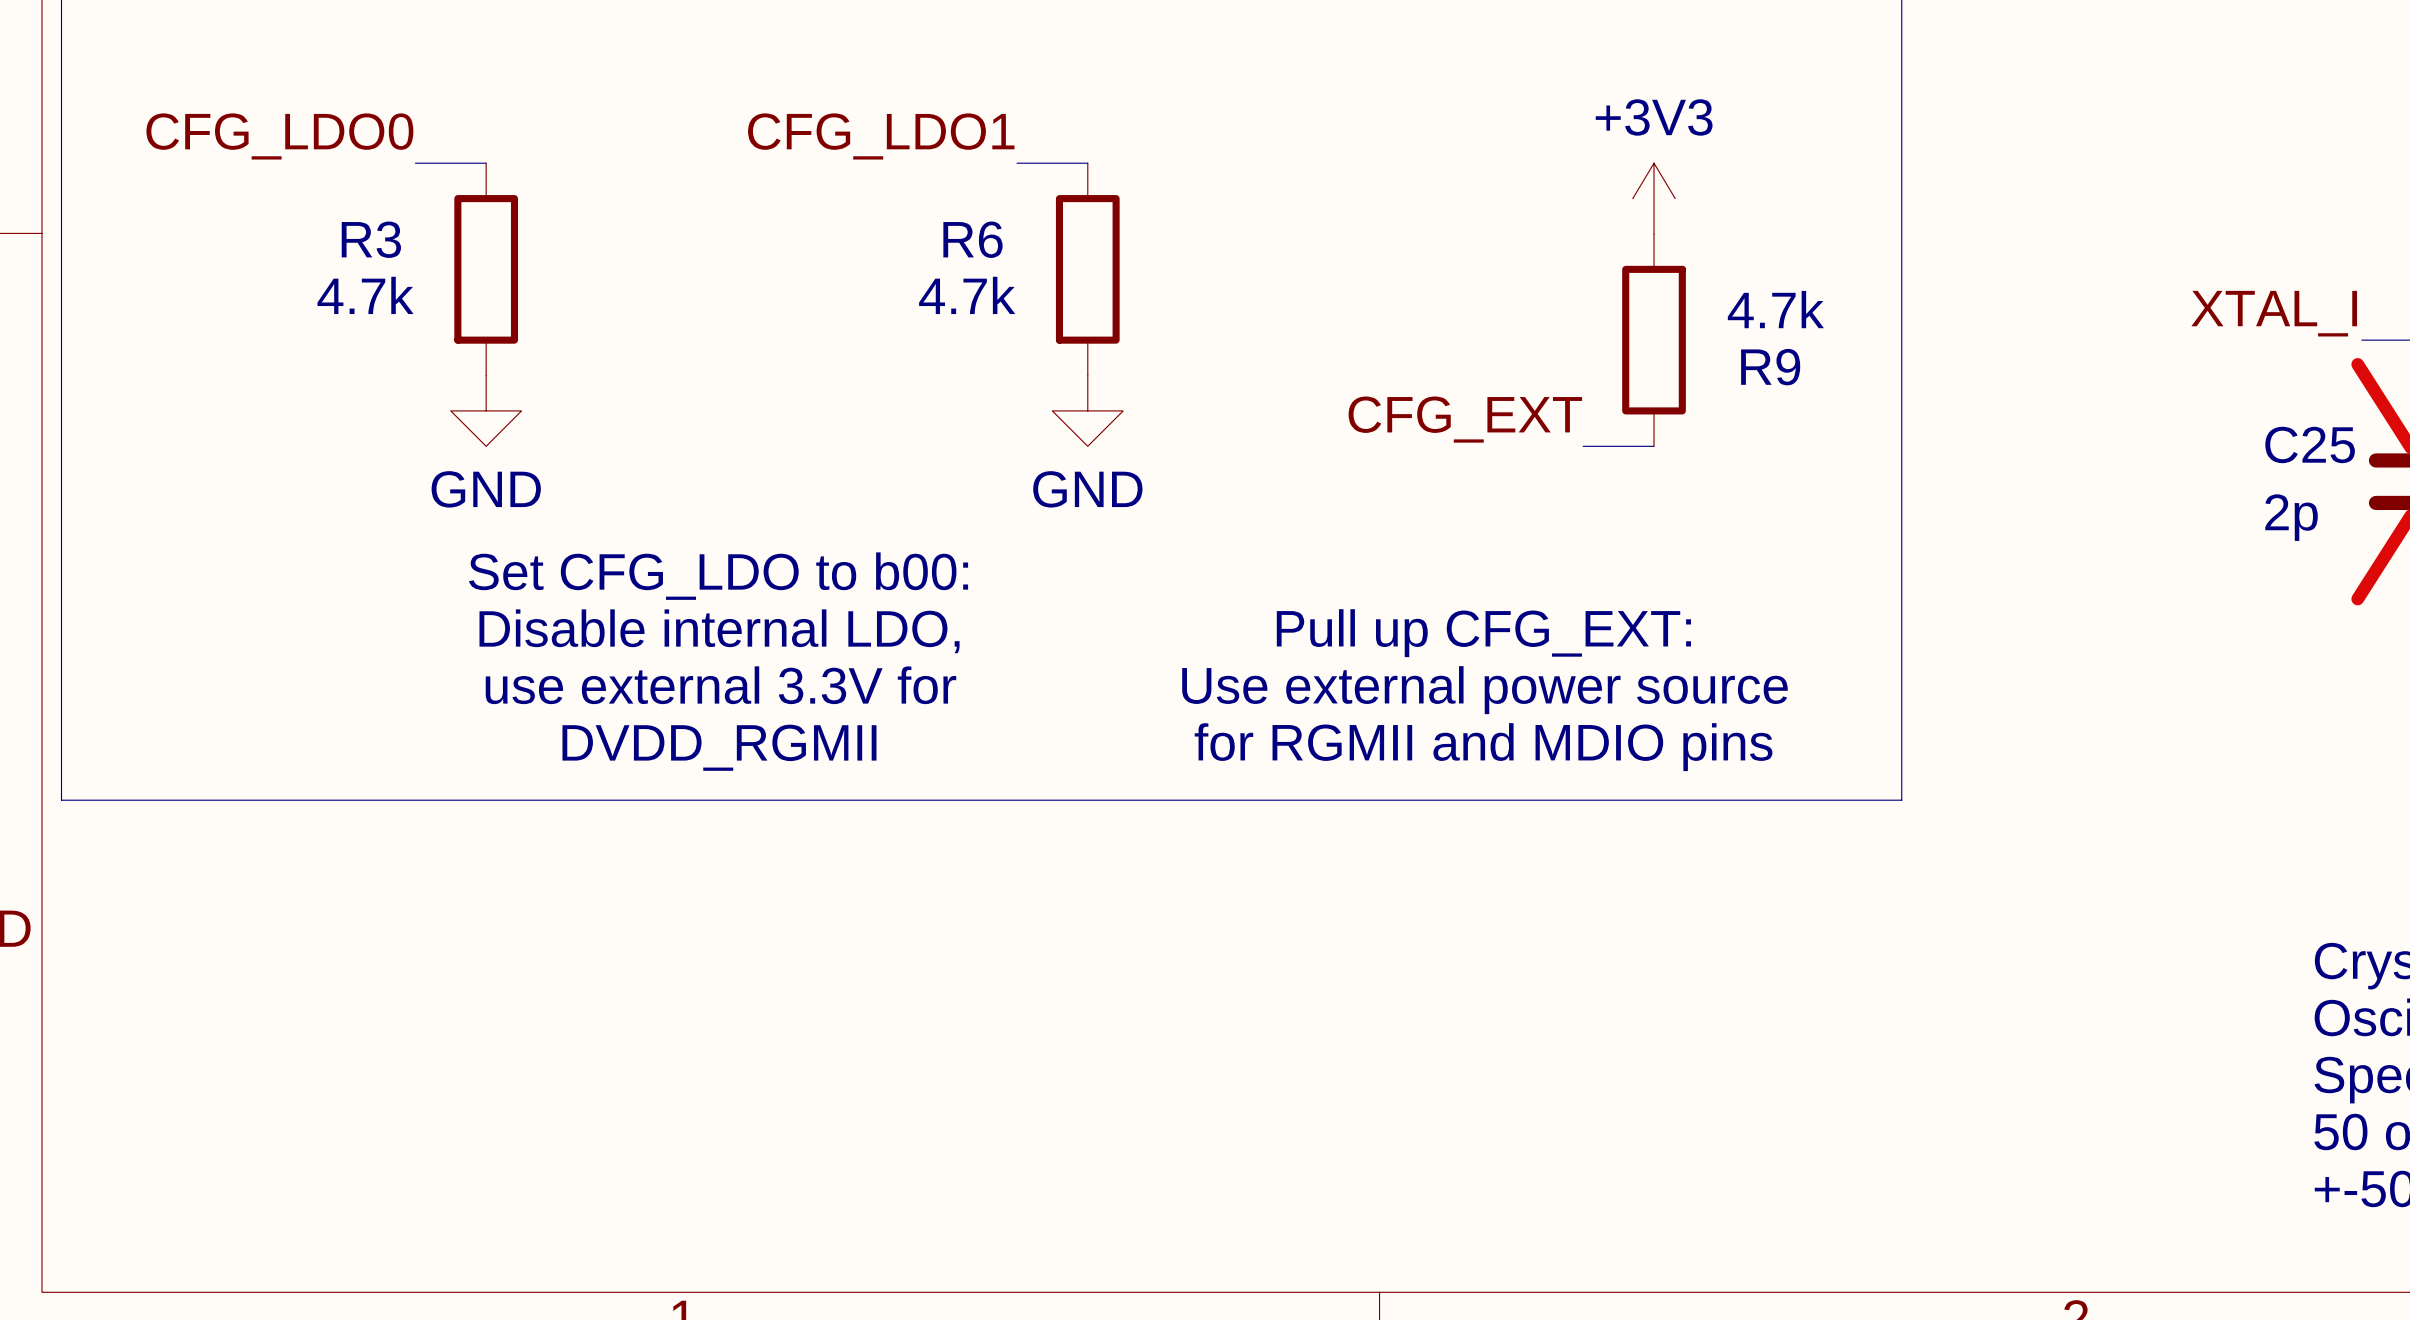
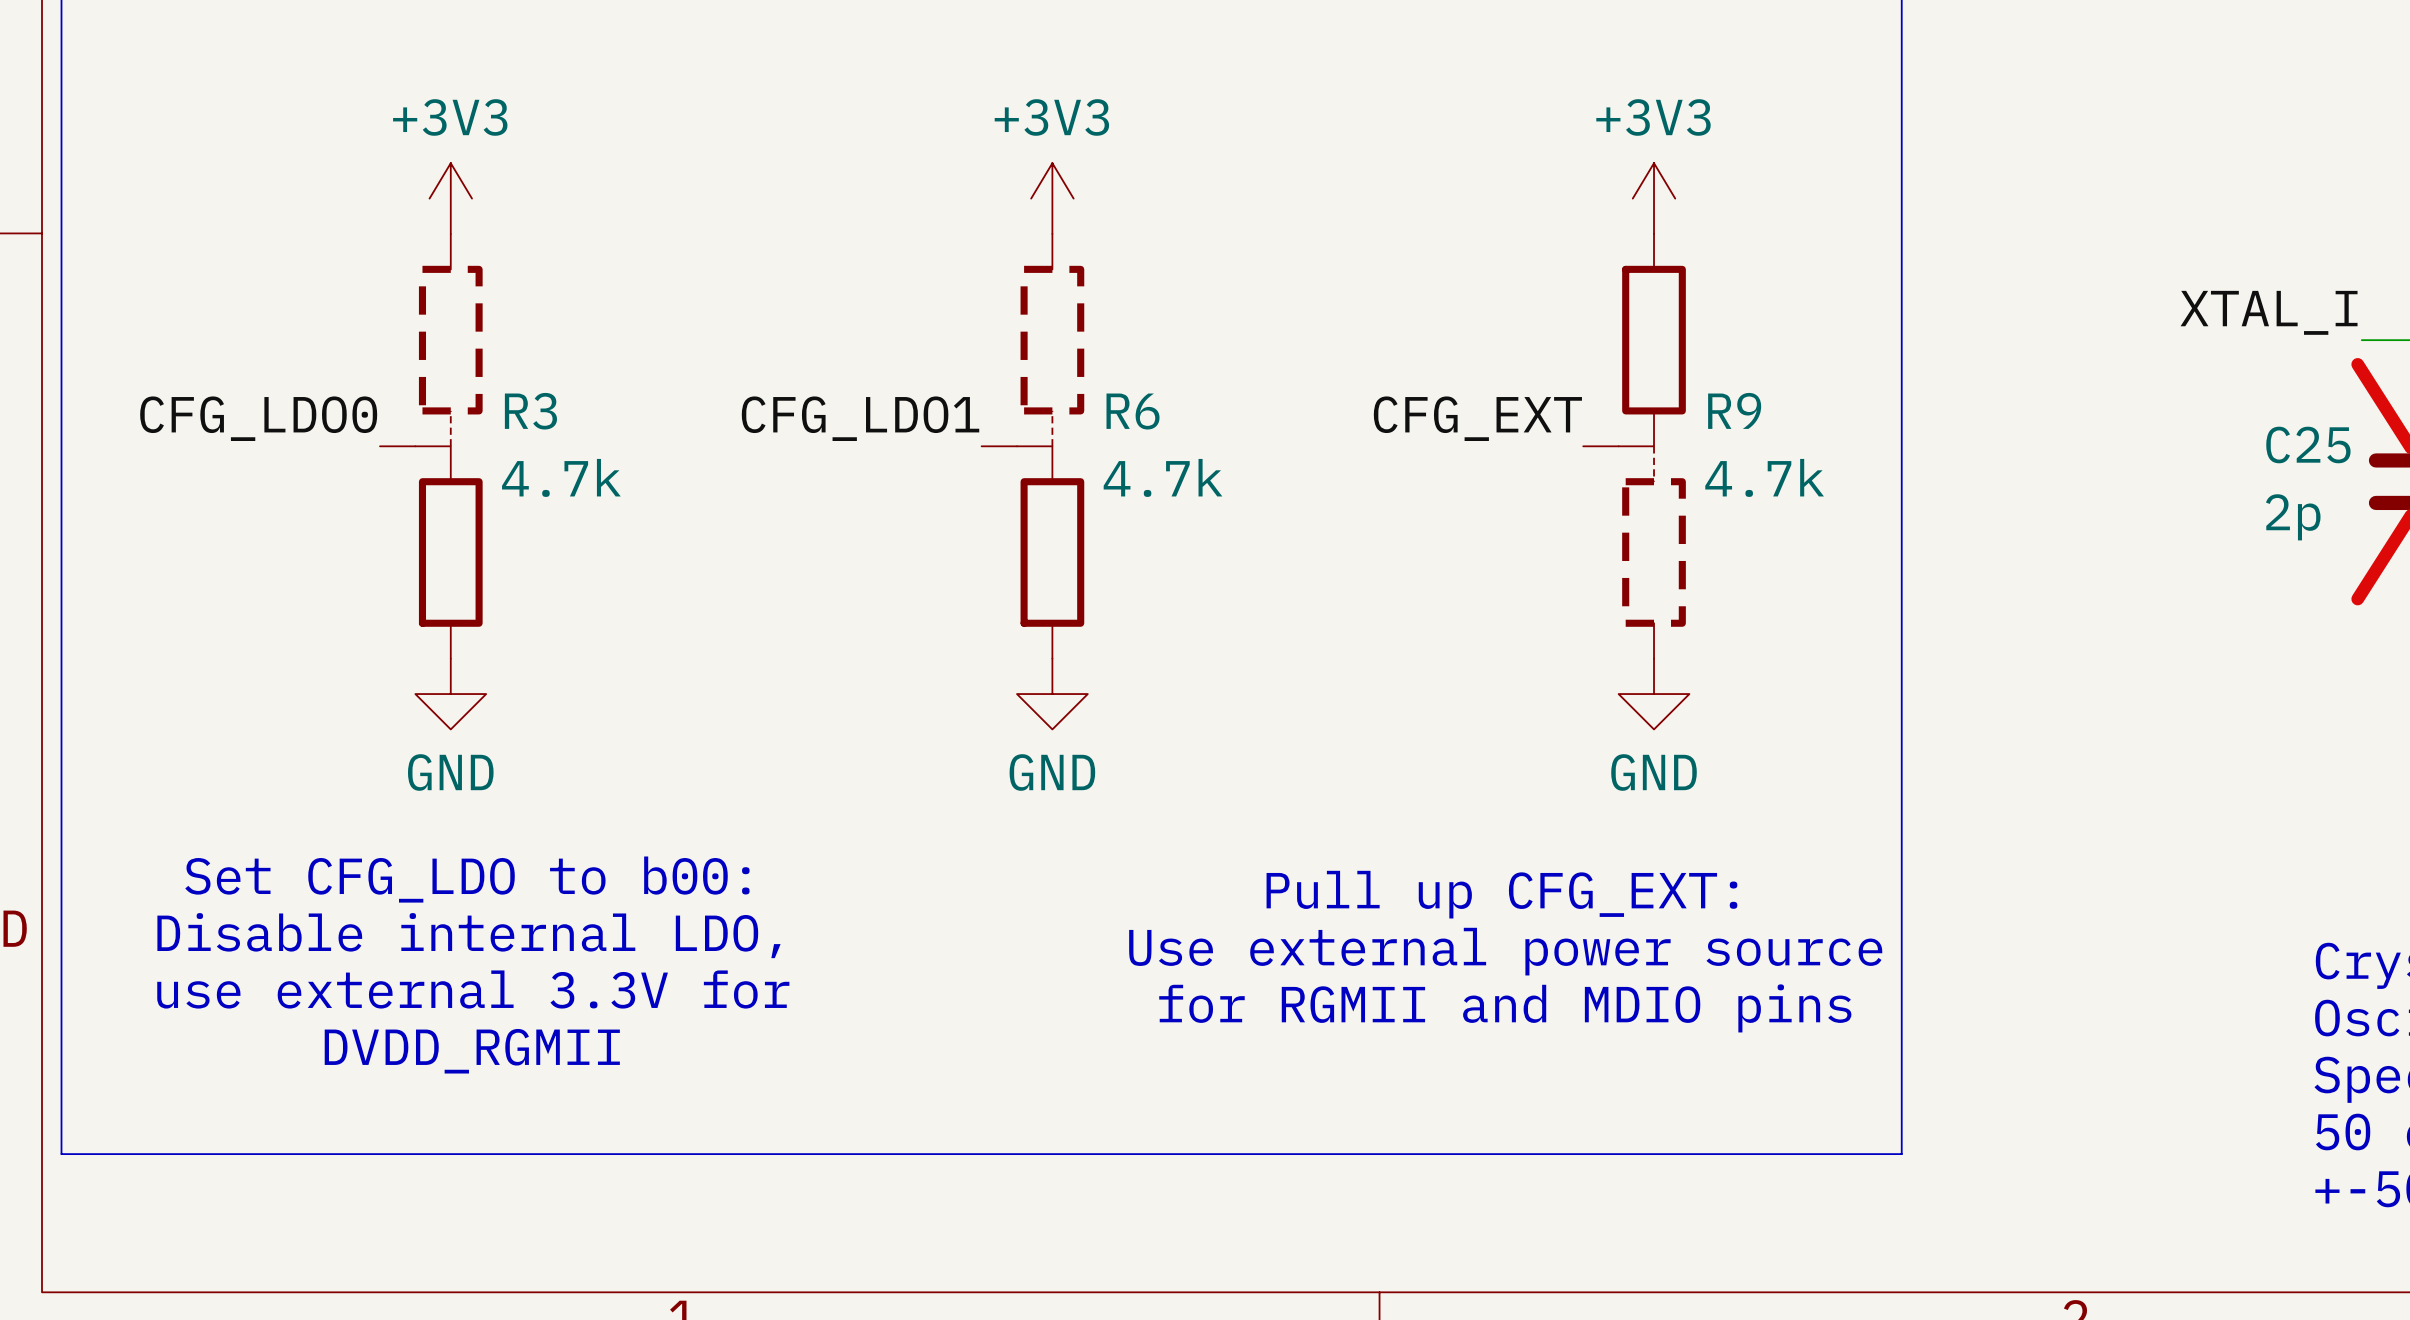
label position: CFG_LDO0 (279, 136) -> CFG_LDO0 (258, 418)
label position: CFG_LDO1 (881, 136) -> CFG_LDO1 (860, 418)
wire: (415, 163) (486, 163) -> none
R3 symbol: [454, 163, 519, 376] -> [380, 233, 483, 659]
wire: (1017, 163) (1087, 163) -> none
R6 symbol: [1055, 163, 1120, 376] -> [981, 233, 1085, 659]
power symbol: none -> +3V3 (450, 198)
power symbol: none -> +3V3 (1052, 198)
R9 symbol: [1622, 233, 1686, 447] -> [1583, 233, 1686, 659]
R3 name position: R3 (371, 239) -> R3 (530, 411)
R6 name position: R6 (973, 239) -> R6 (1133, 411)
R3 value position: 4.7k (365, 295) -> 4.7k (561, 477)
R6 value position: 4.7k (967, 295) -> 4.7k (1162, 477)
R9 value position: 4.7k (1775, 309) -> 4.7k (1764, 477)
R9 name position: R9 (1770, 367) -> R9 (1734, 410)
power symbol position: GND (486, 410) -> GND (450, 694)
power symbol position: GND (1087, 410) -> GND (1052, 694)
text position: Set CFG_LDO to b00: (718, 576) -> Set CFG_LDO to b00: (467, 879)
text position: Disable internal LDO, (719, 631) -> Disable internal LDO, (468, 935)
text position: Pull up CFG_EXT: (1483, 633) -> Pull up CFG_EXT: (1501, 894)
text position: use external 3.3V for (720, 685) -> use external 3.3V for (473, 989)
text position: Use external power source (1484, 690) -> Use external power source (1505, 951)
power symbol: none -> GND (1654, 694)
text position: DVDD_RGMII (719, 747) -> DVDD_RGMII (472, 1051)
text position: for RGMII and MDIO pins (1483, 747) -> for RGMII and MDIO pins (1505, 1008)
line: (61, 800) (1901, 800) -> (61, 800) (61, 1154) (1901, 1154) (1901, 800)

